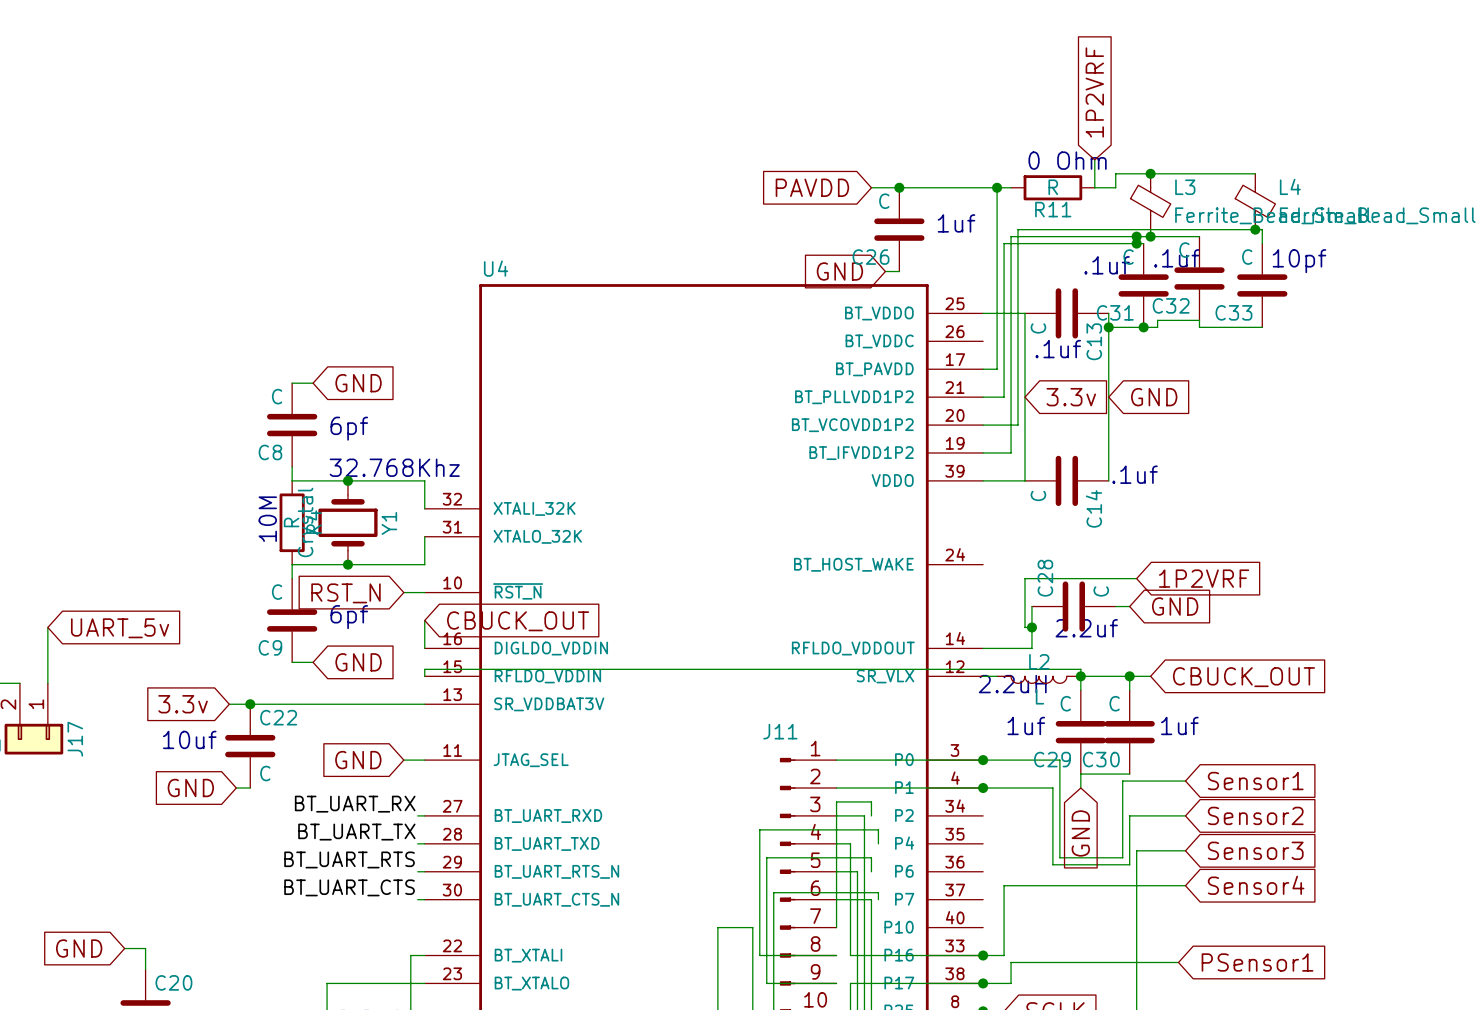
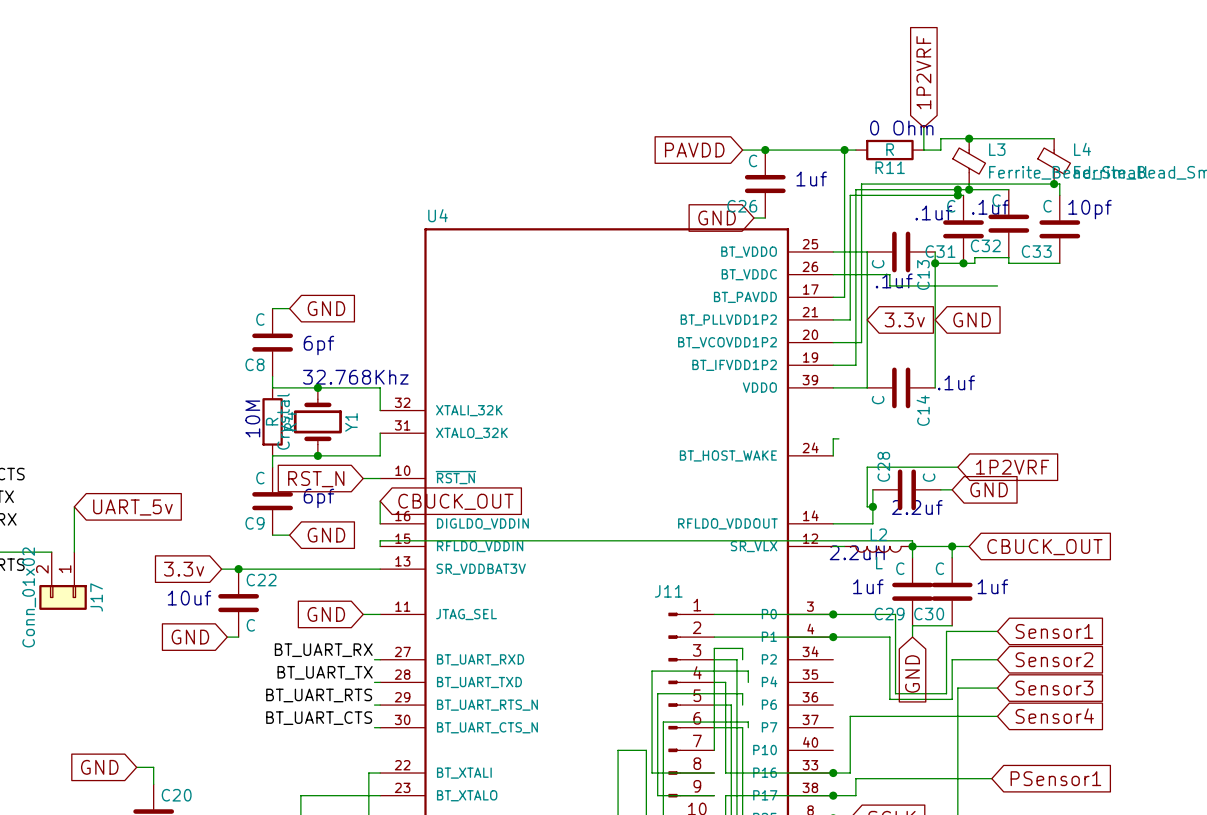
wire: none -> (833, 274) (889, 274) (889, 285) (997, 285)
wire: none -> (838, 438) (833, 438) (833, 455)

